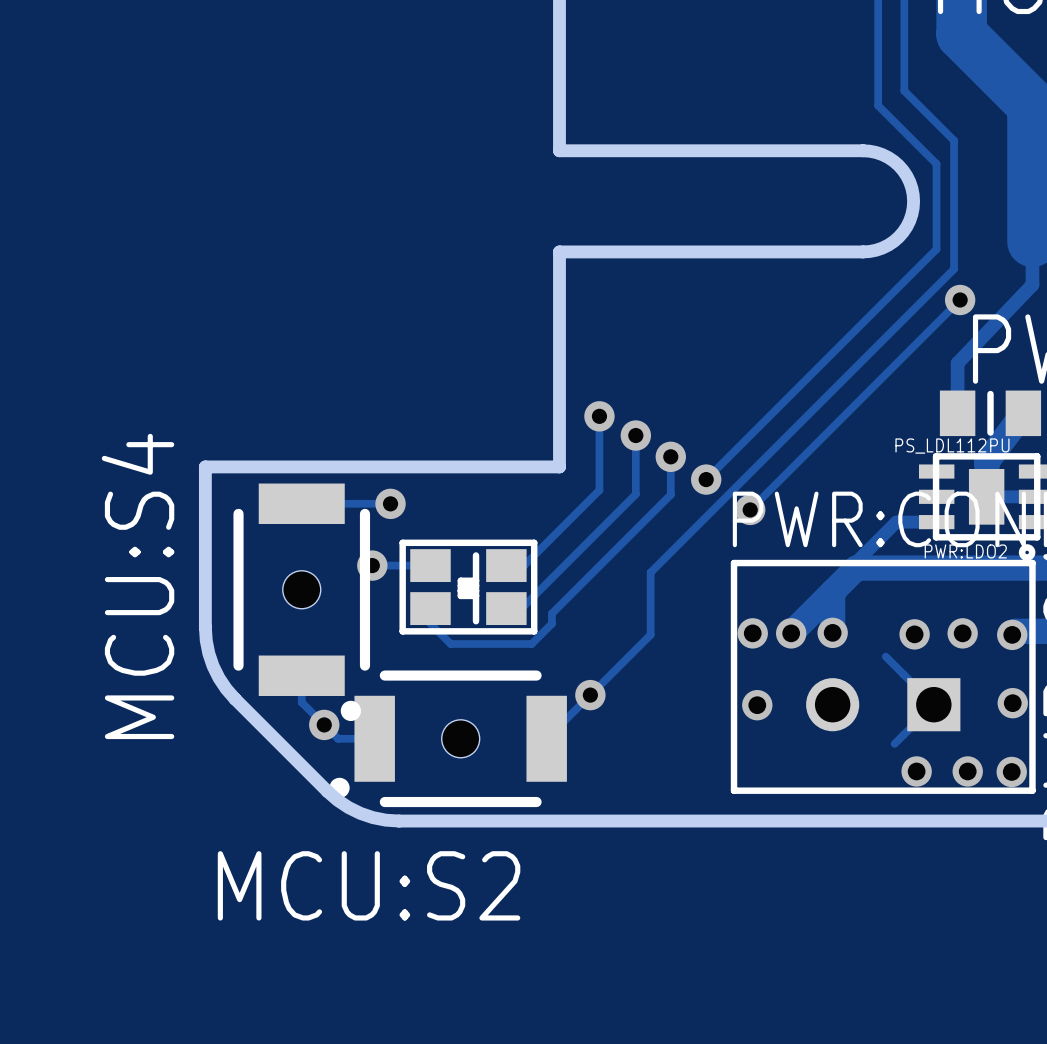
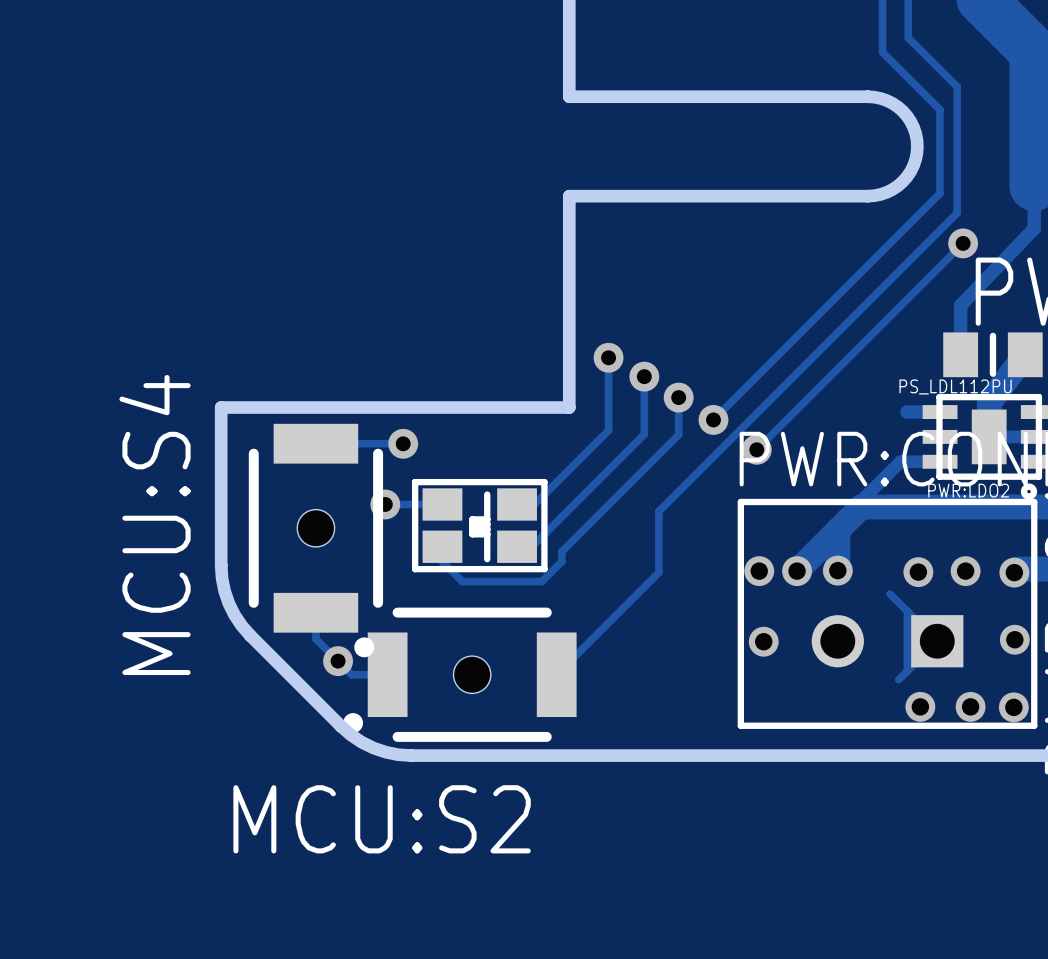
track: none -> (906, 411) (940, 412)
track: none -> (907, 611) (907, 671)
via: (590, 695) -> none

